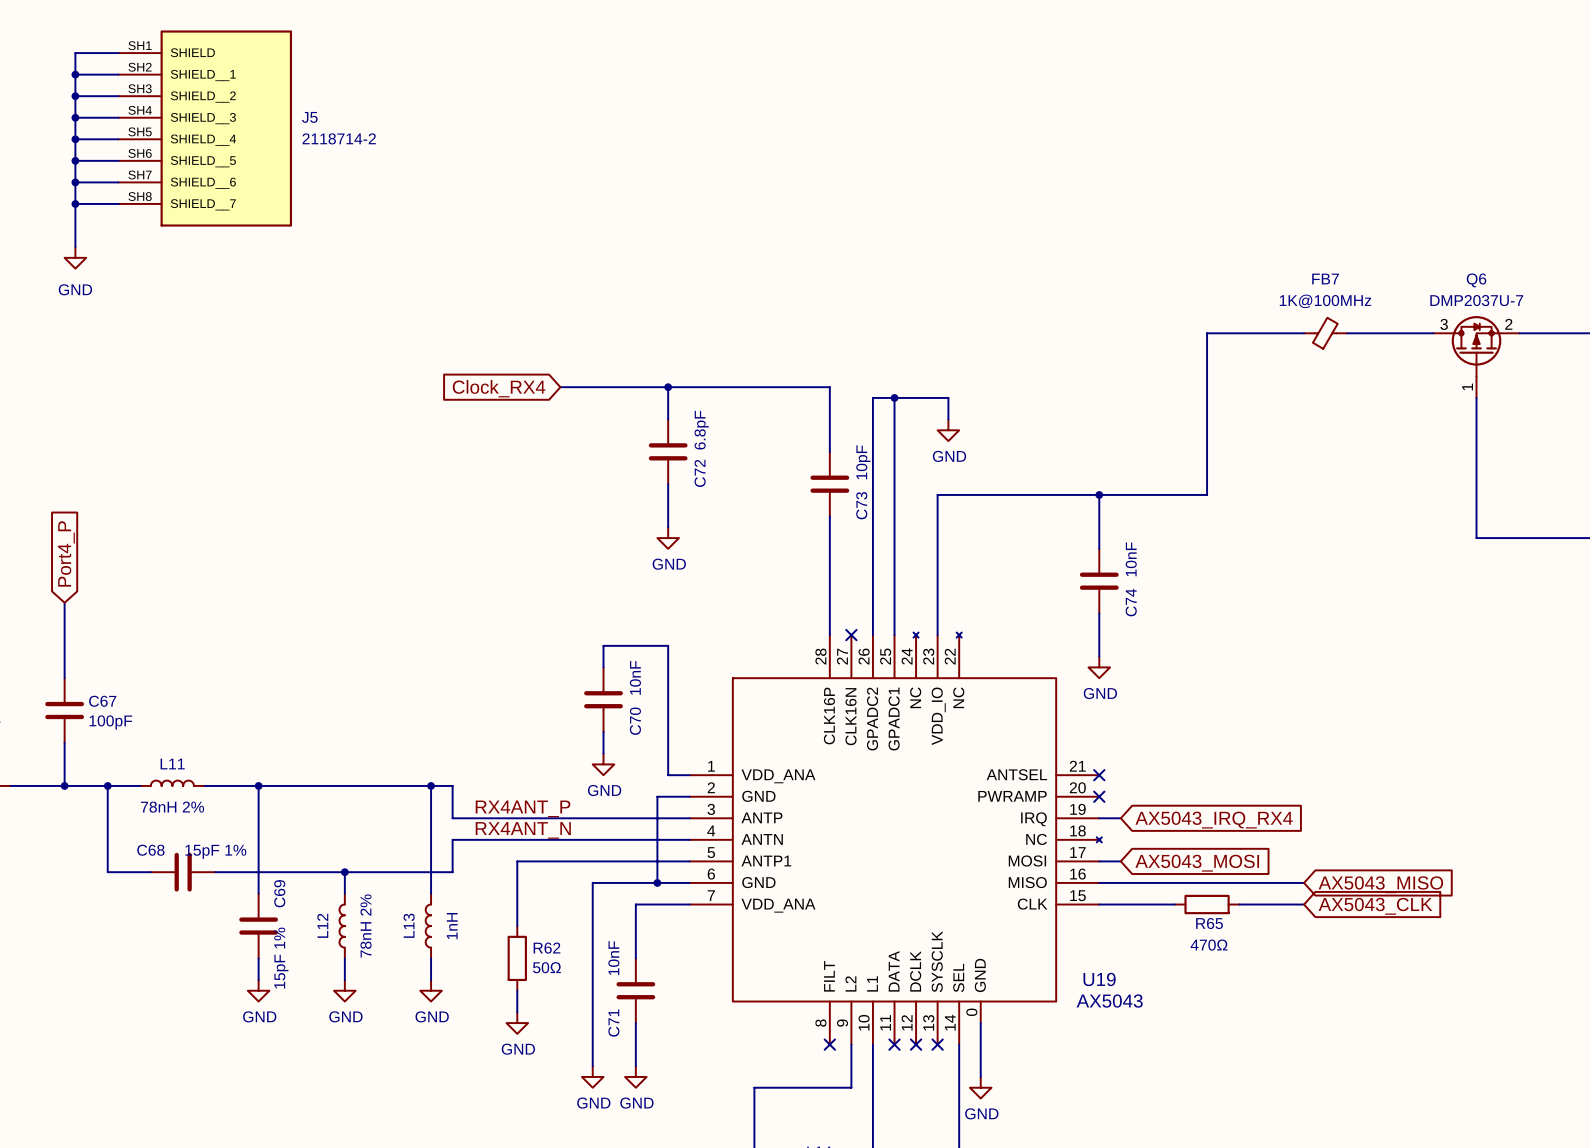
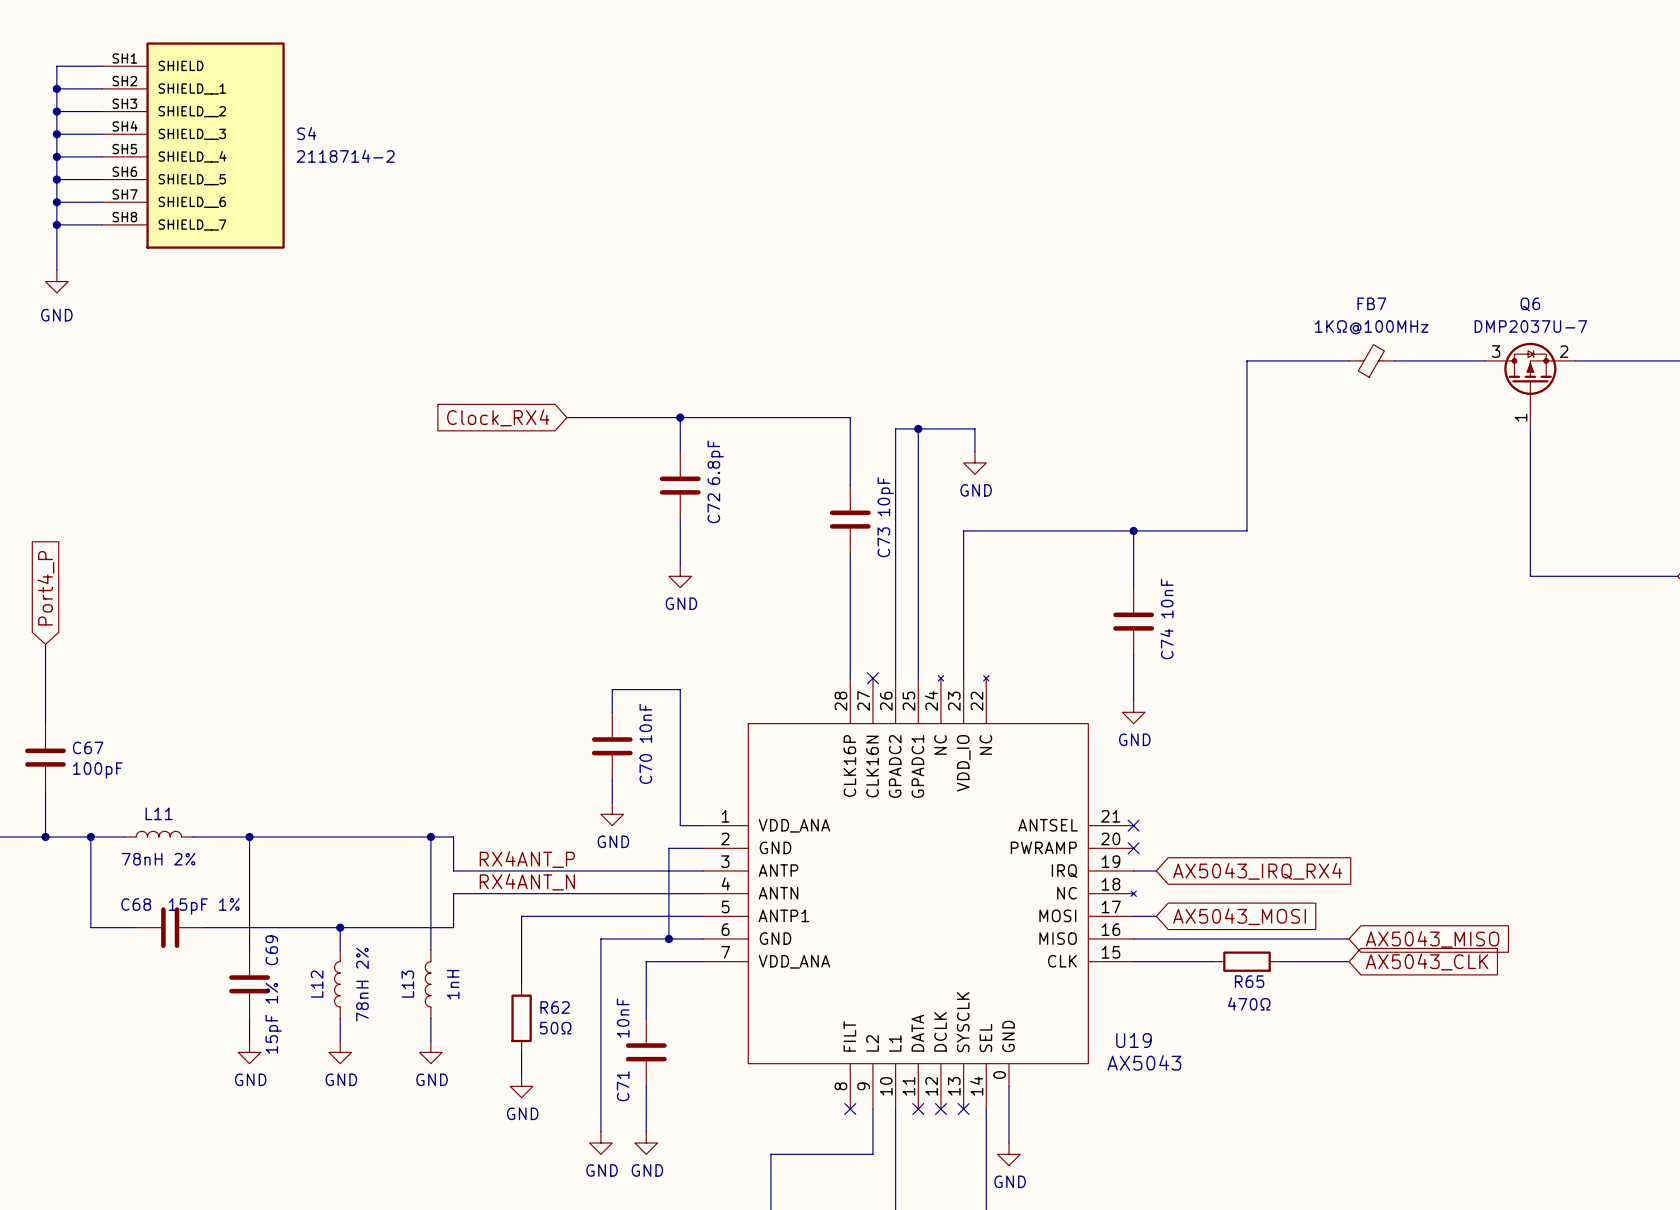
J5 name: J5 (309, 117) -> S4 (306, 133)
FB7 value: 1K@100MHz (1325, 301) -> 1KΩ@100MHz (1371, 327)

